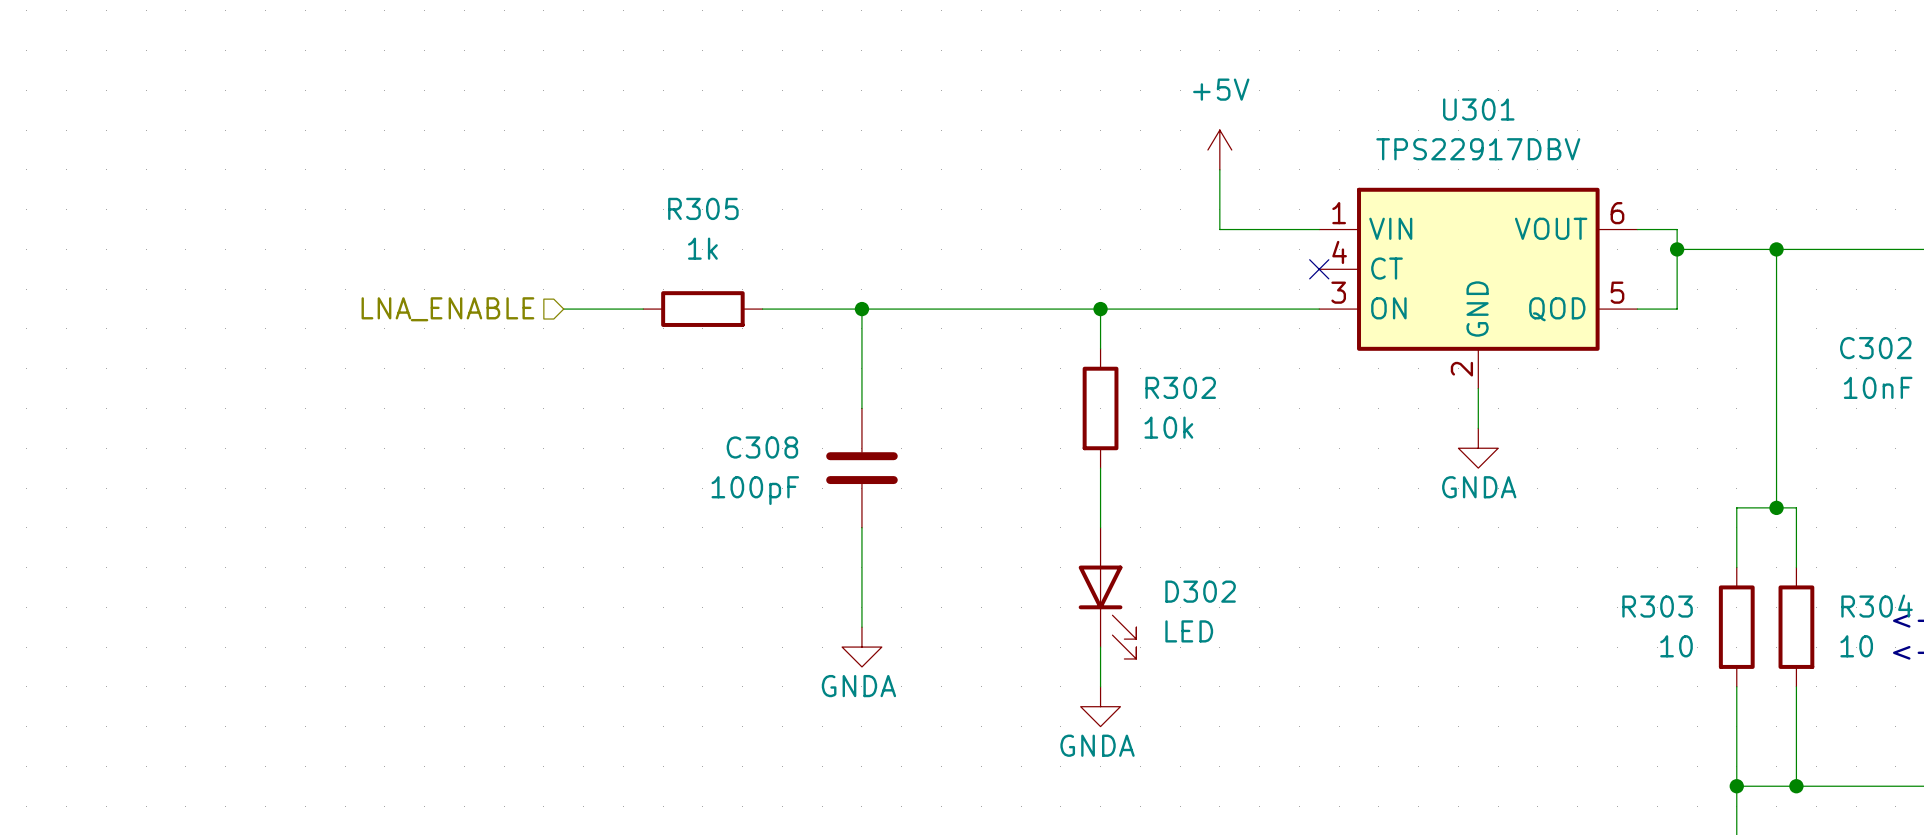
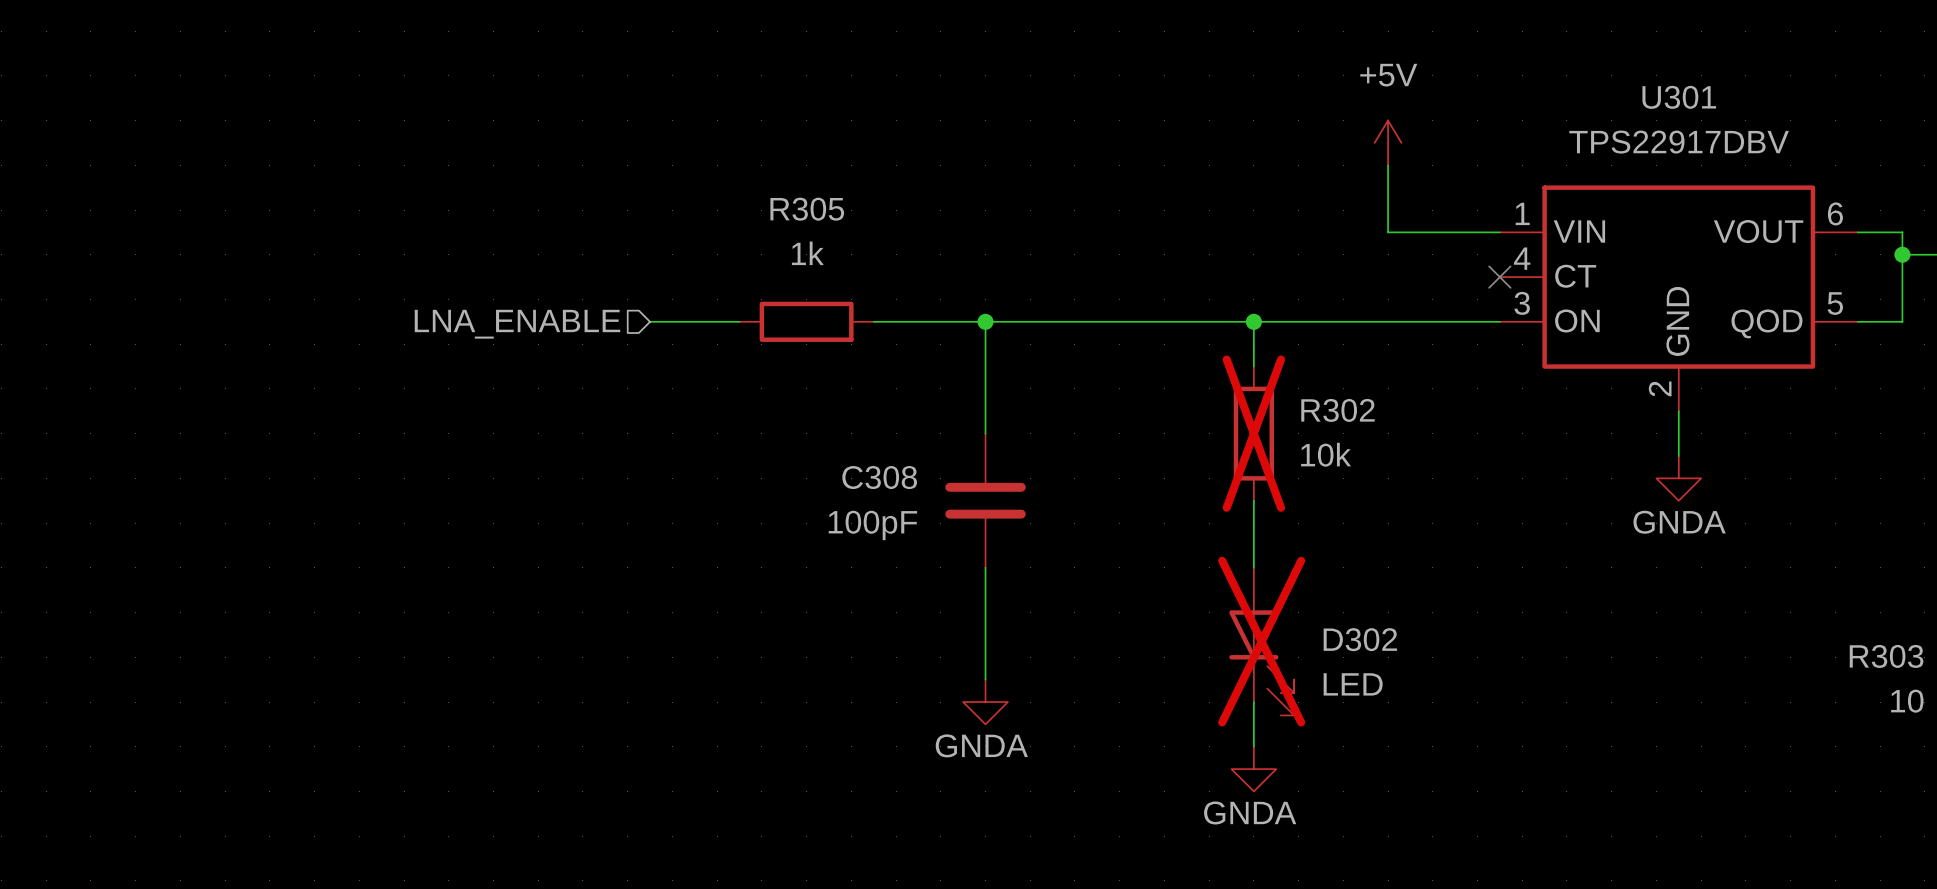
R302 do-not-place cross: none -> (1253, 433)
D302 do-not-place cross: none -> (1261, 641)

